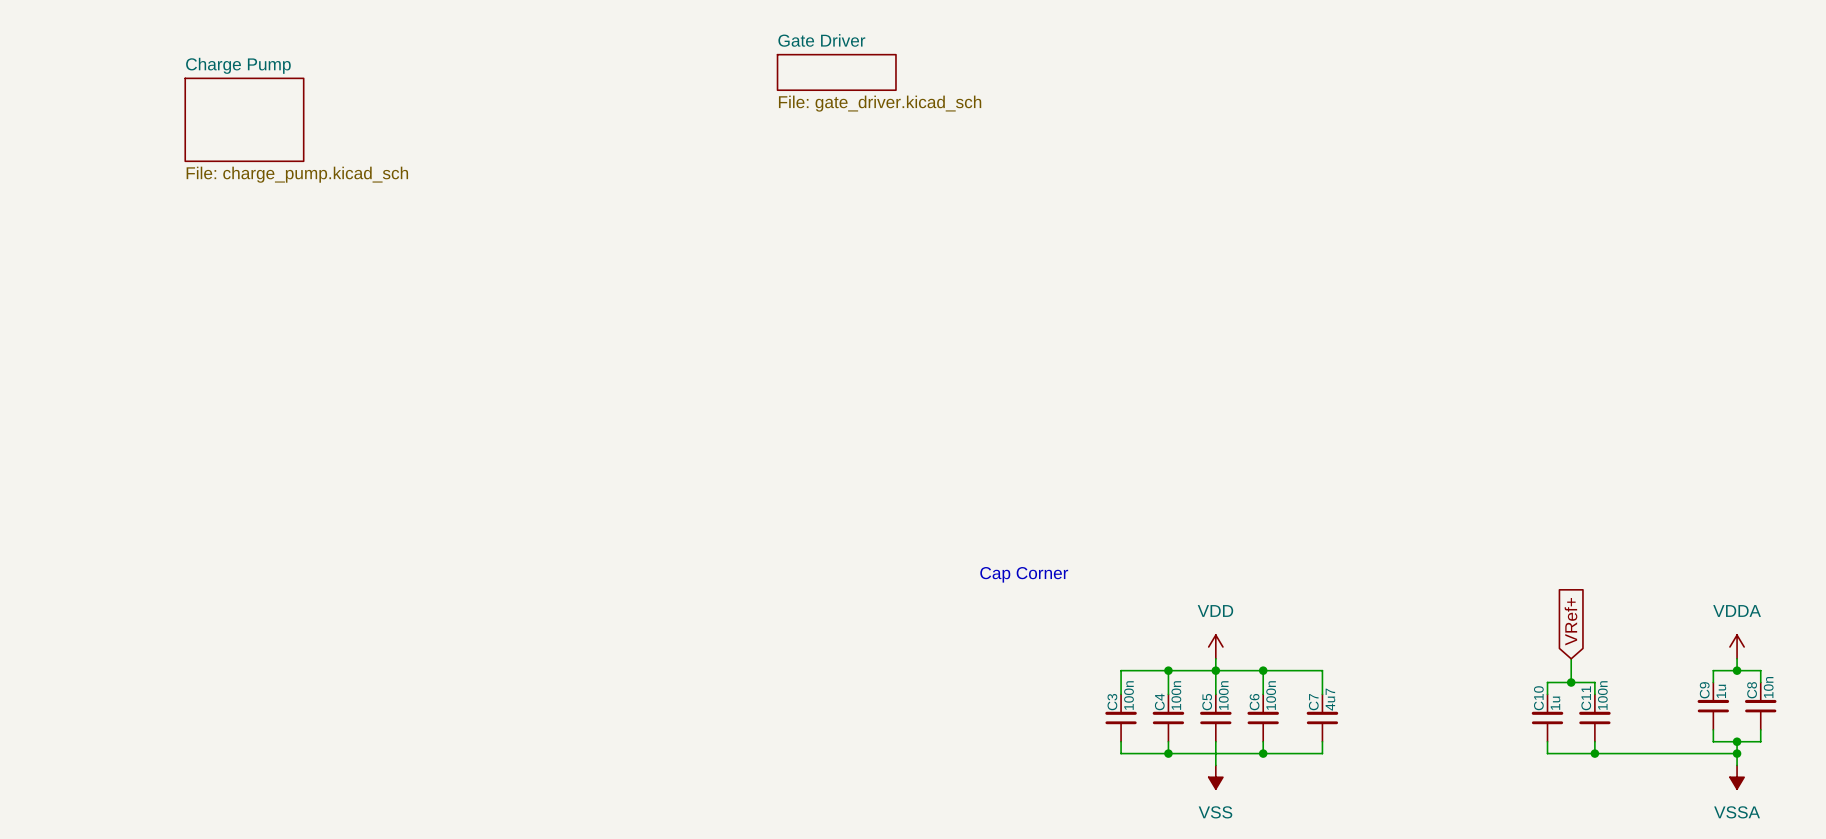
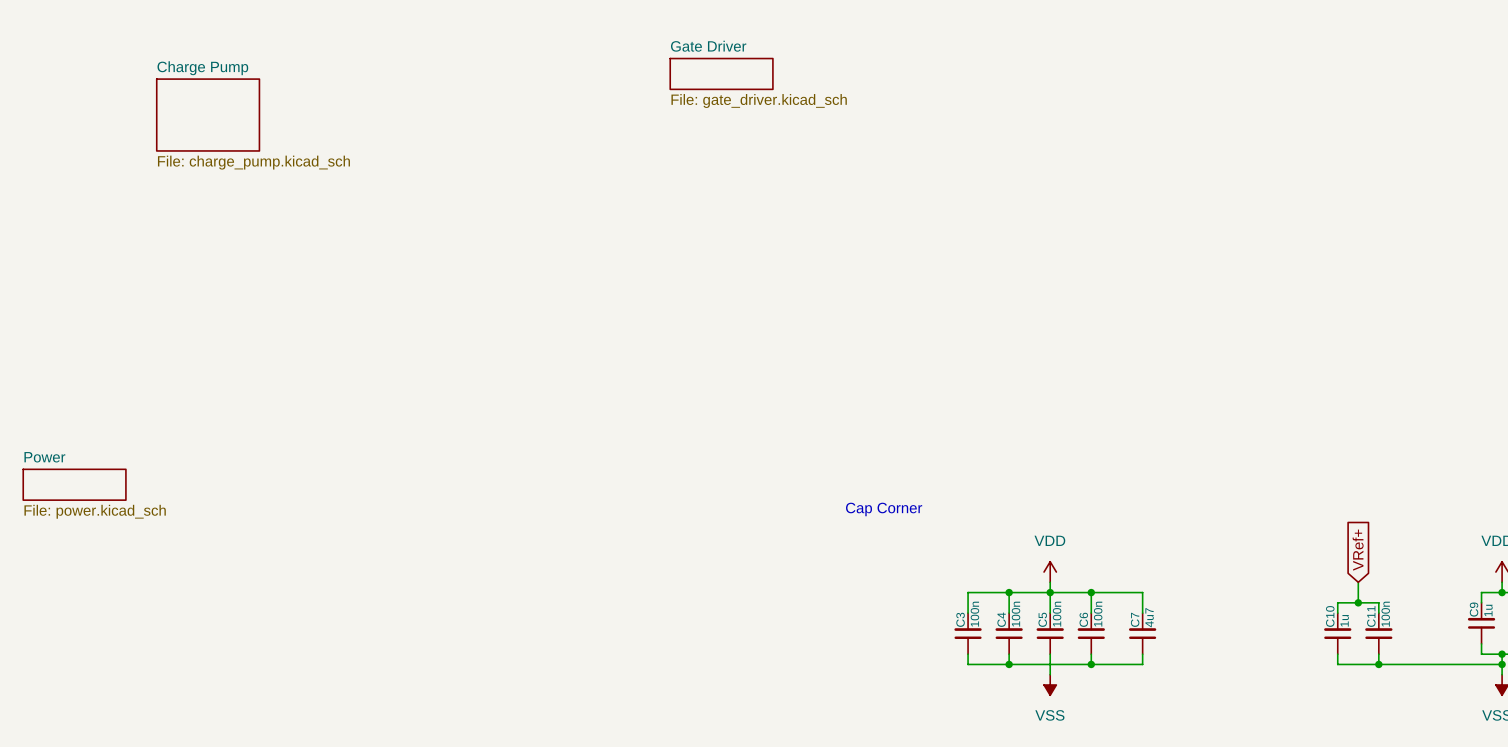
sheet Power: none -> File: power.kicad_sch (74, 484)

